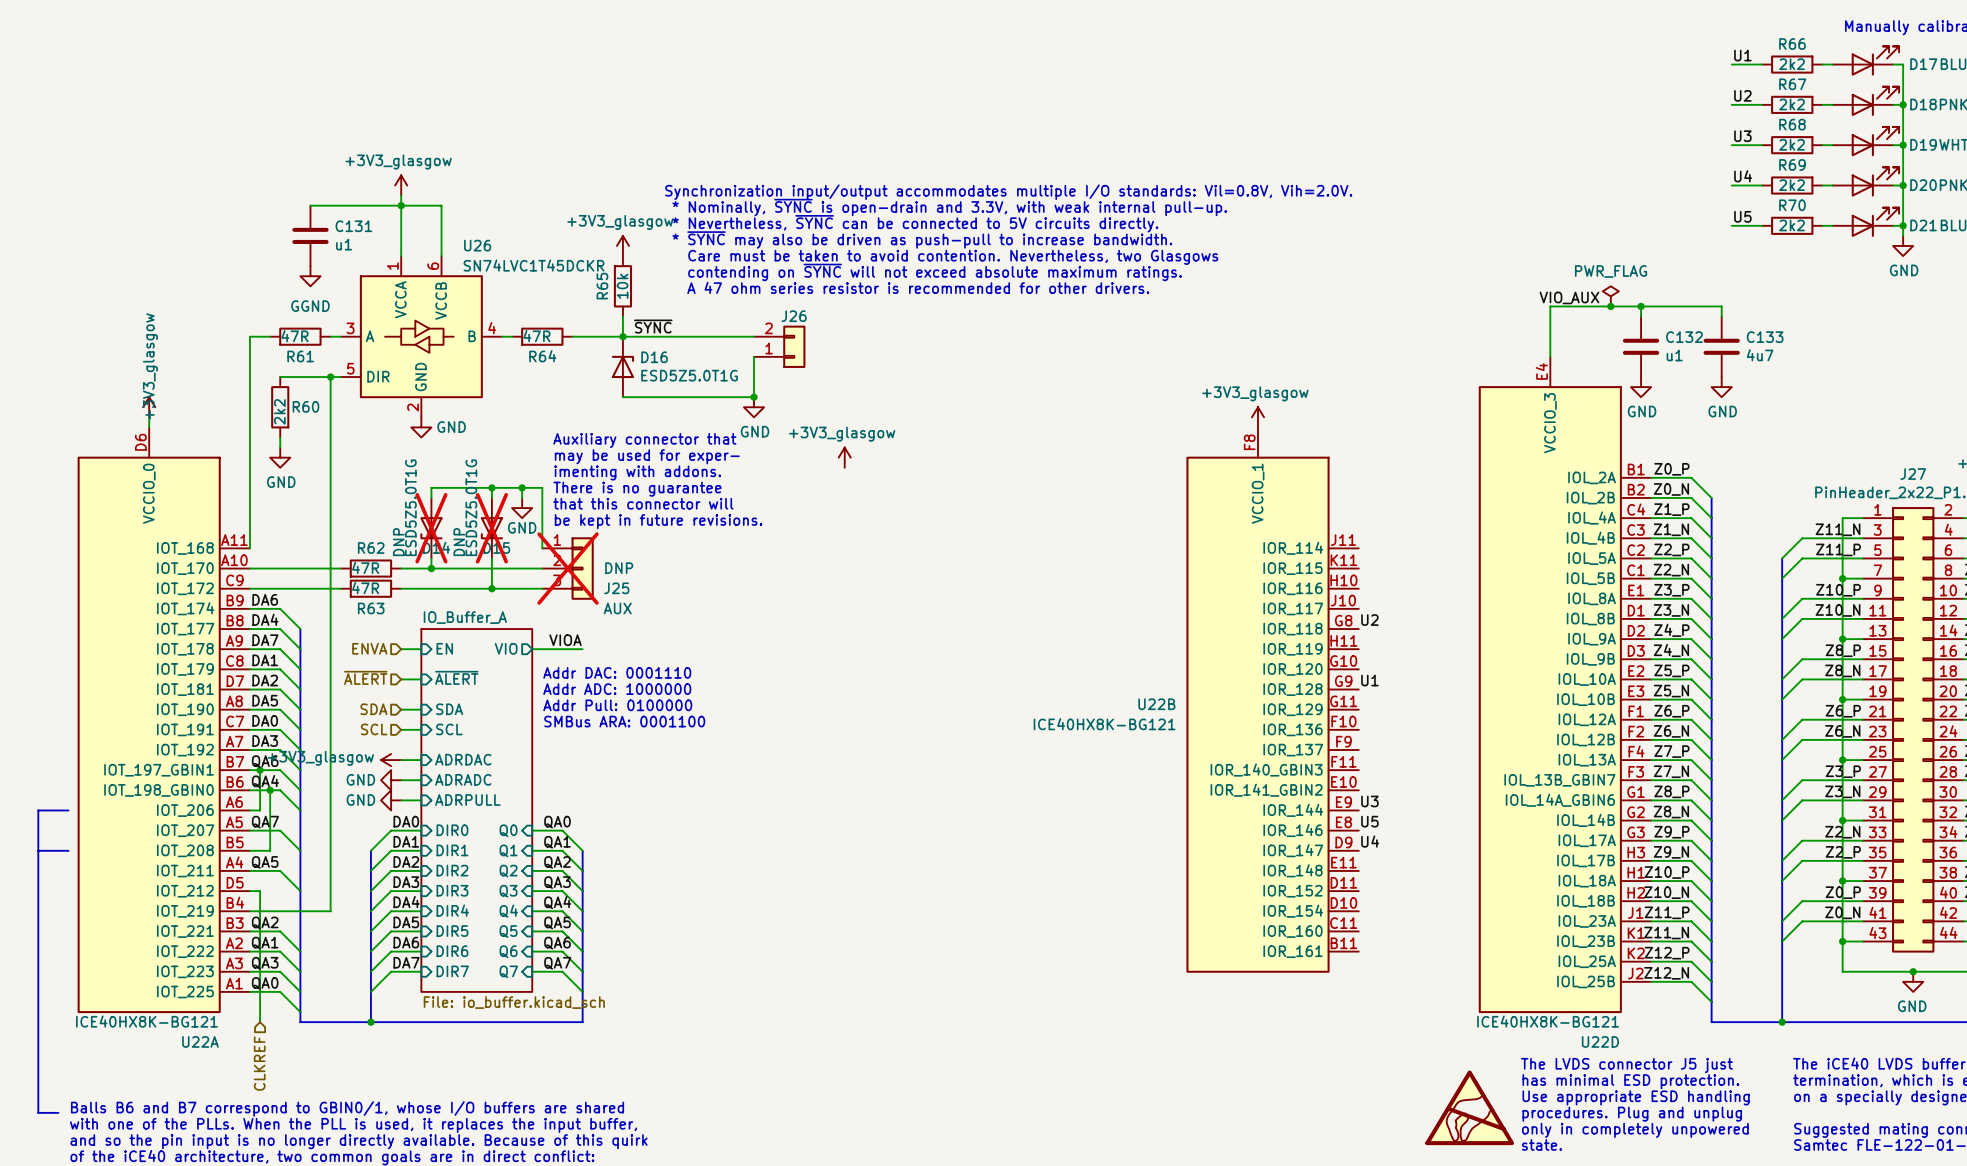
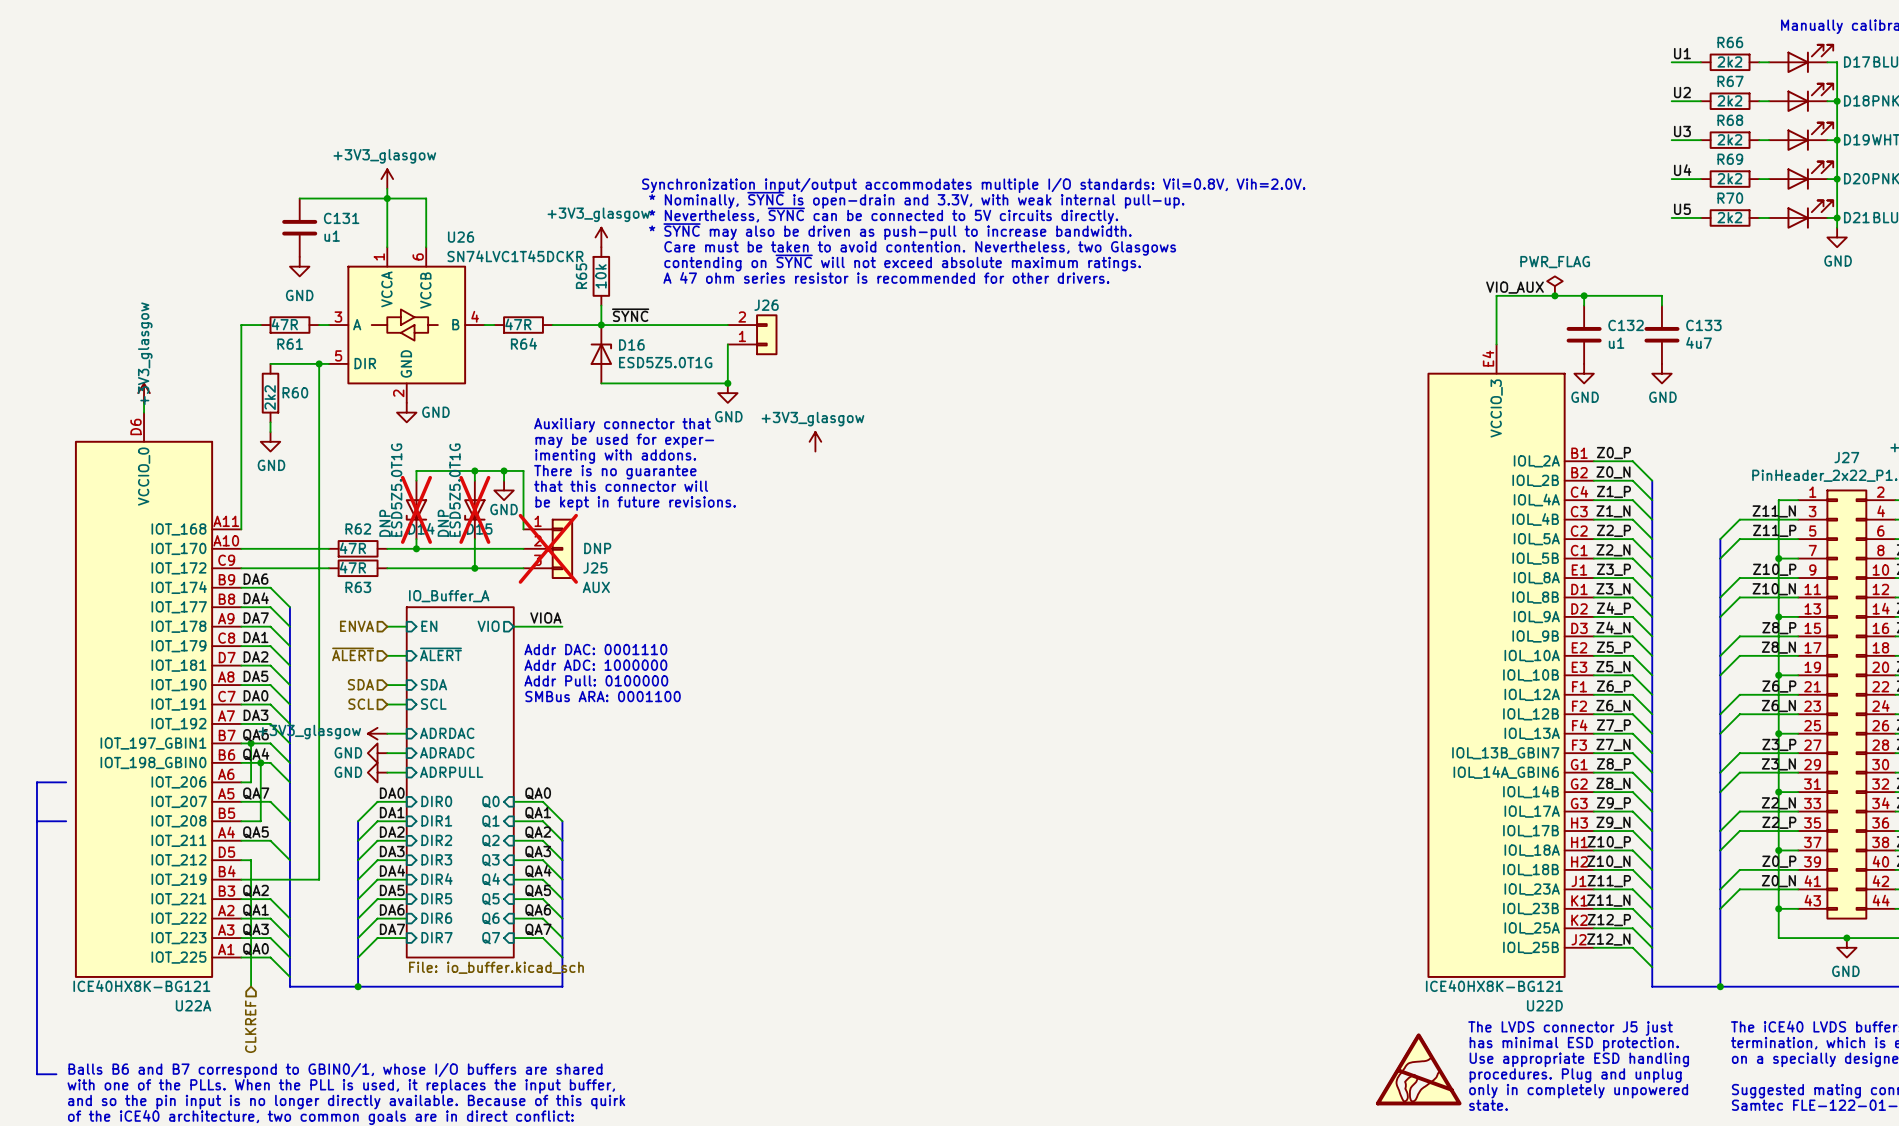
power symbol: GGND (310, 276) -> GND (299, 266)
power symbol: +3V3_glasgow (1258, 417) -> none
label: U2 (1369, 620) -> none
label: U1 (1369, 680) -> none
U22B: ICE40HX8K-BG121 (1272, 700) -> none
label: U3 (1369, 801) -> none
label: U5 (1369, 821) -> none
label: U4 (1370, 841) -> none

